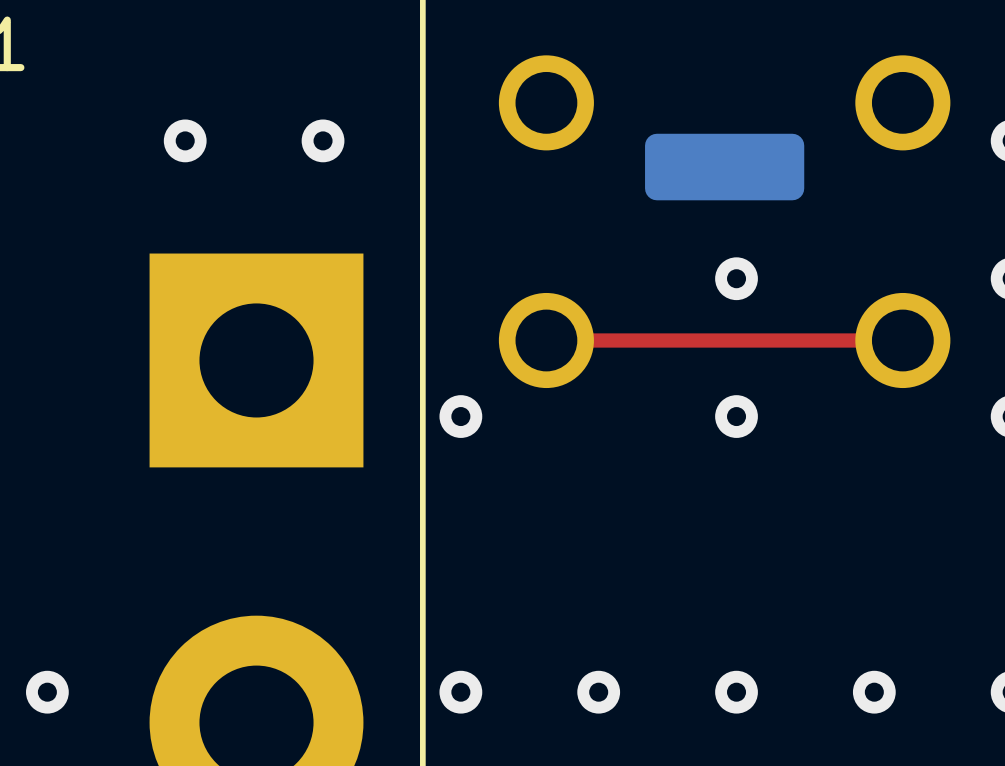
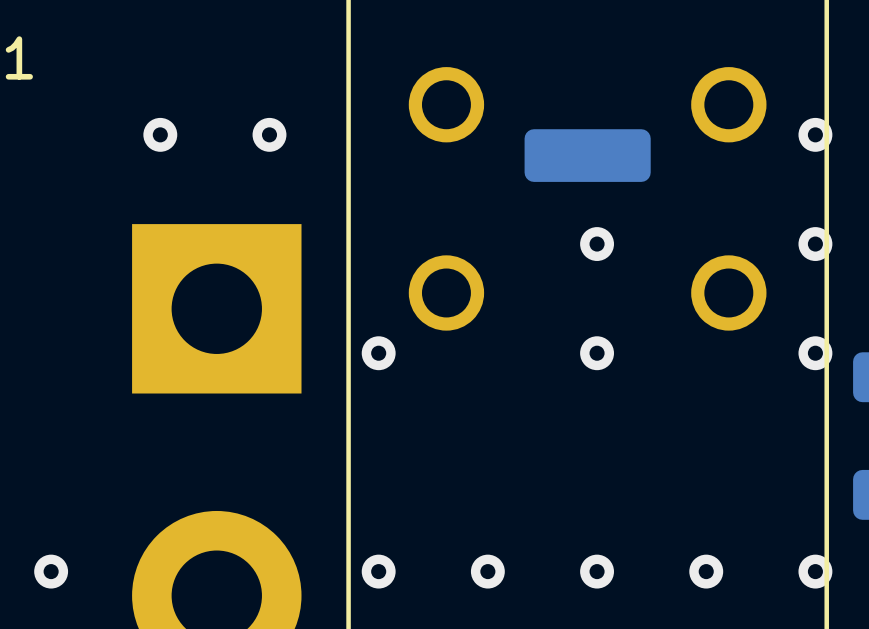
top track: (546, 340) (902, 340) -> none

